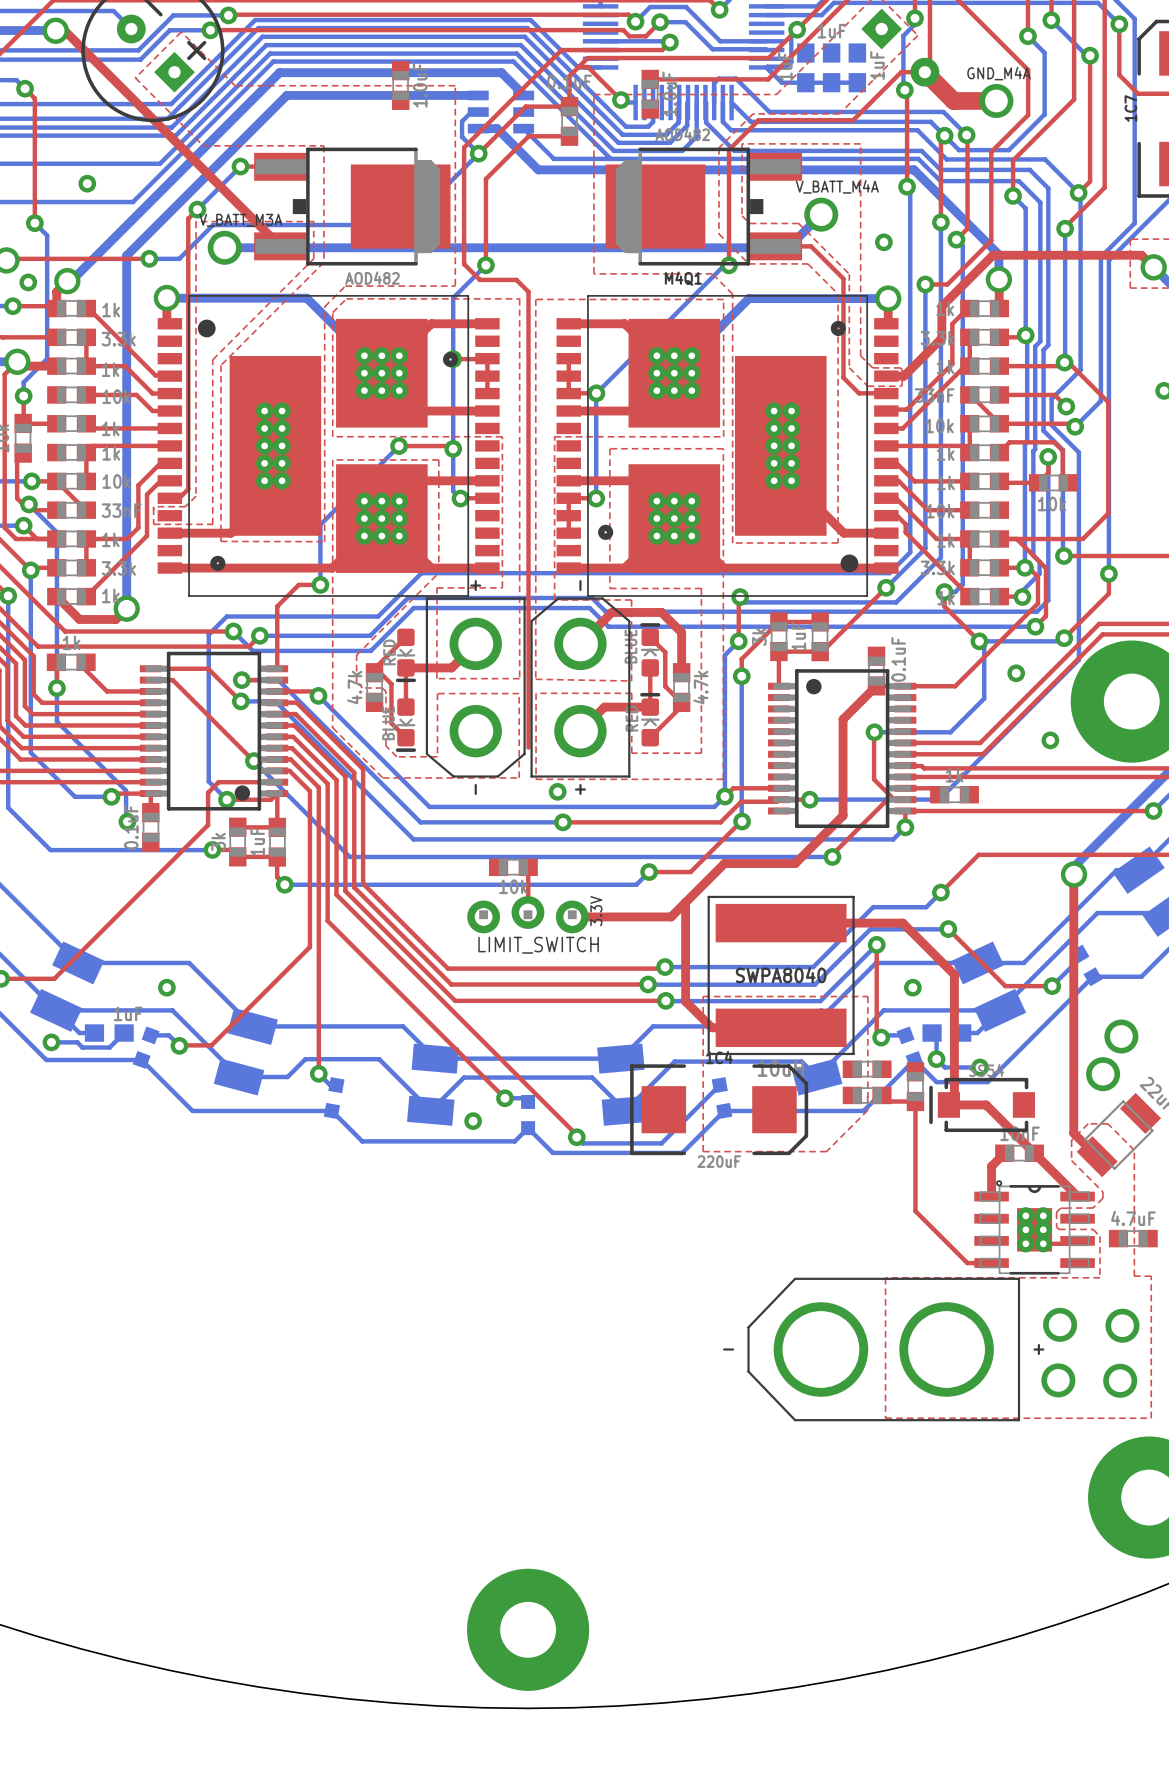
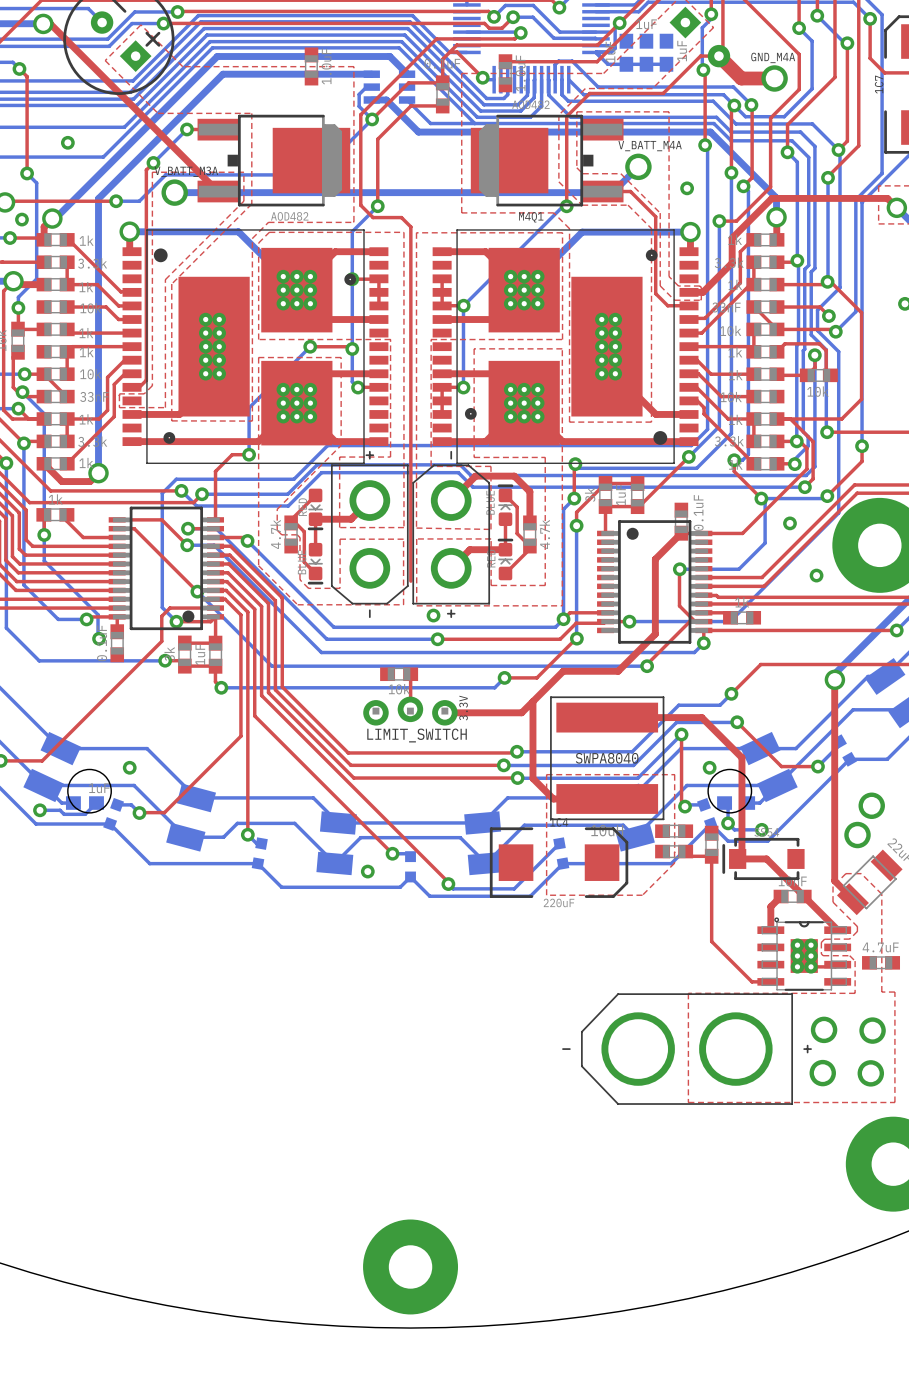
round board edge: none -> [67, 769, 112, 813]
round board edge: none -> [708, 769, 752, 813]

